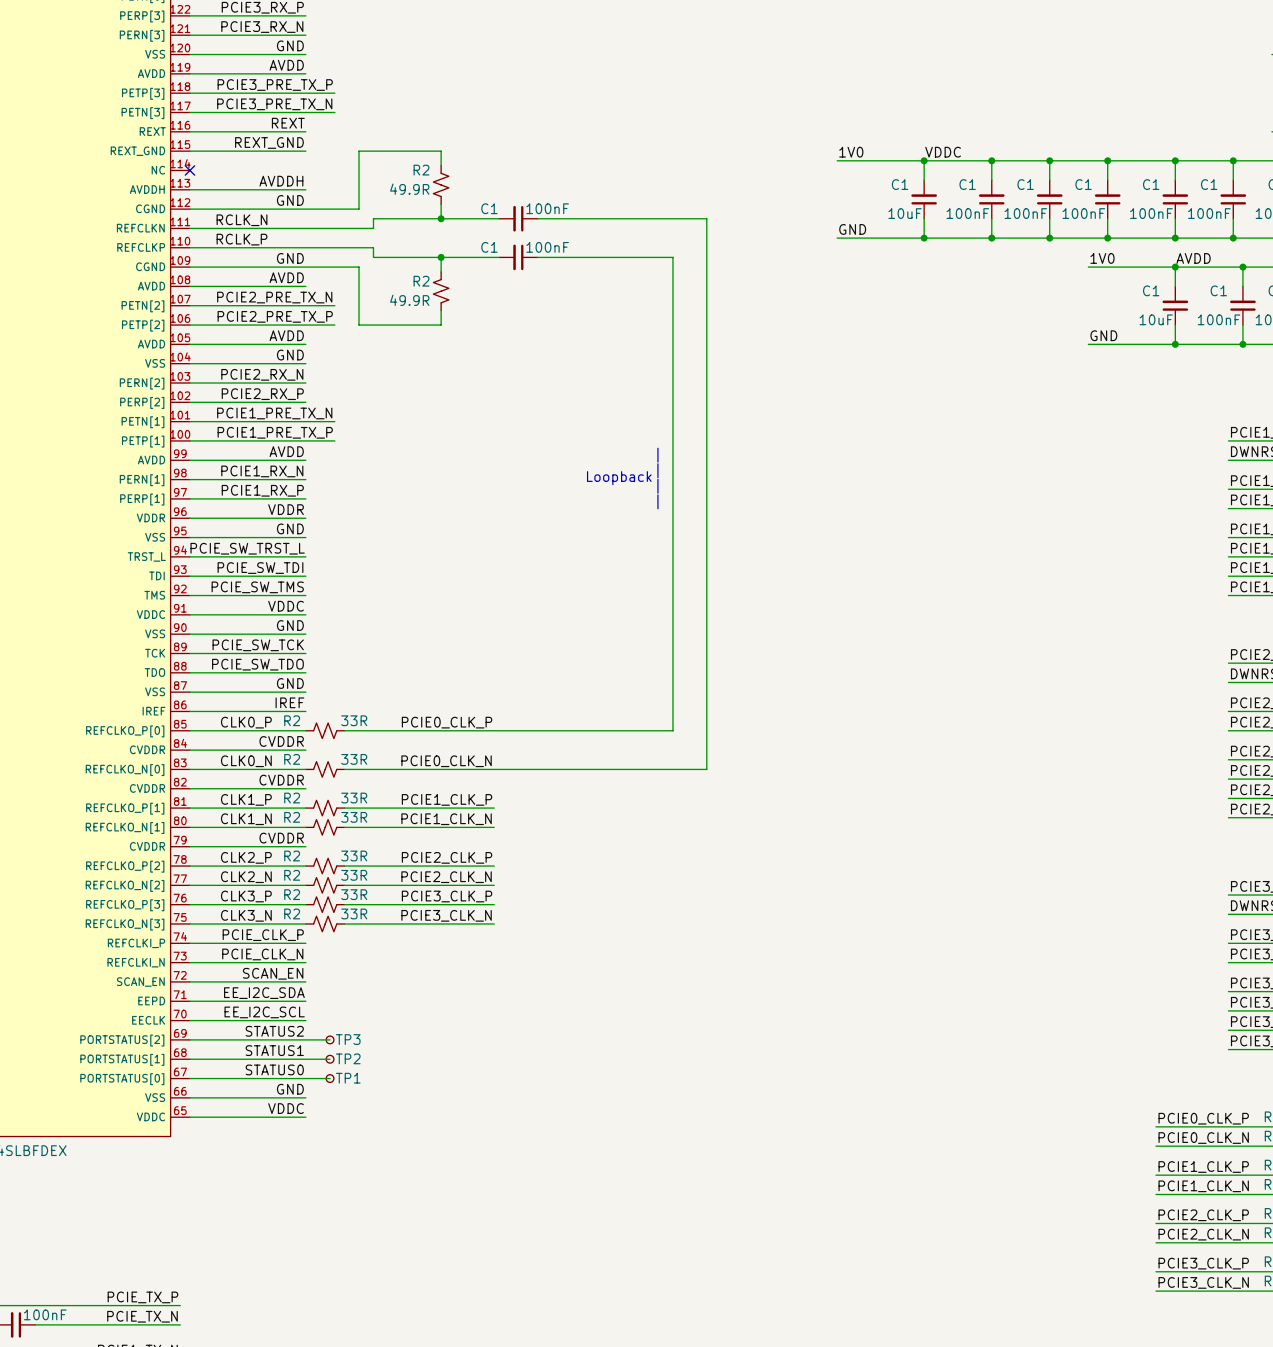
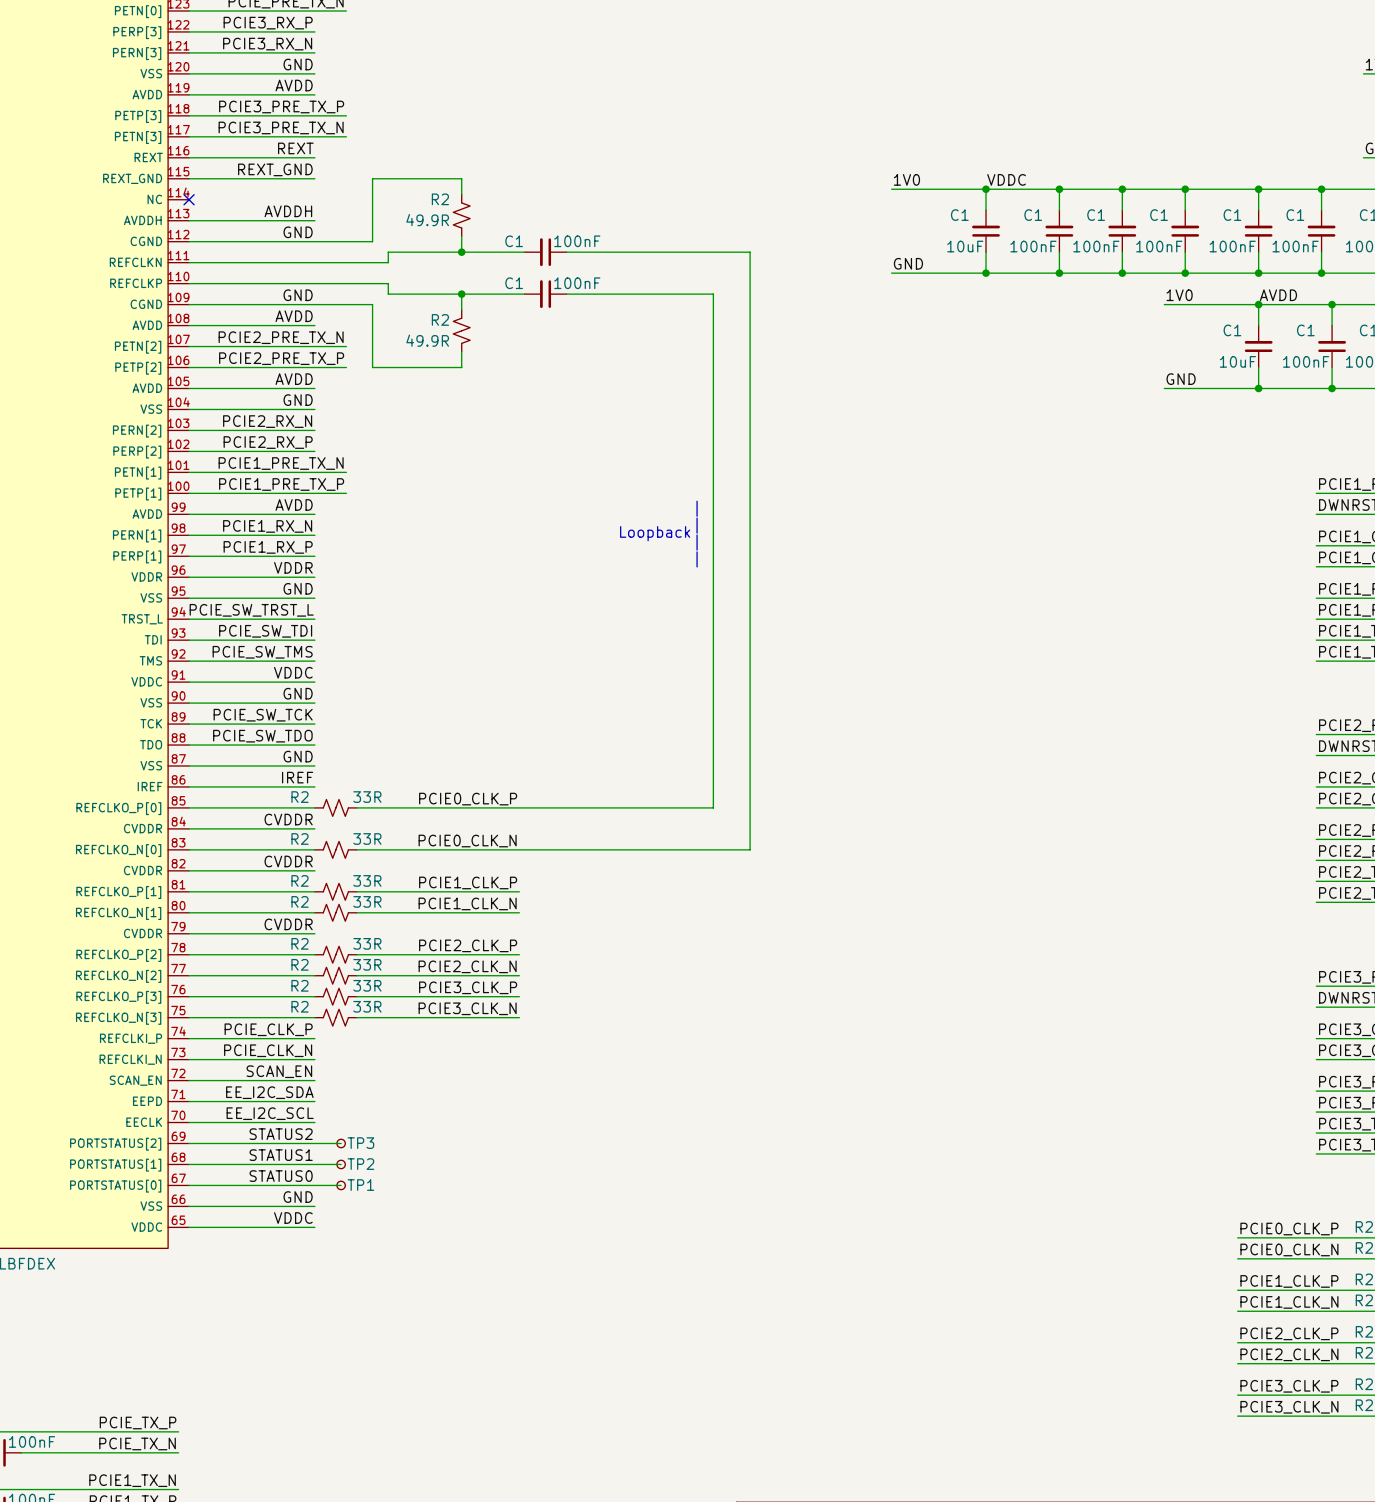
label: RCLK_N (242, 220) -> none
label: RCLK_P (242, 239) -> none
label: CLK0_P (246, 722) -> none
label: CLK0_N (246, 761) -> none
label: CLK1_P (246, 799) -> none
label: CLK1_N (246, 819) -> none
label: CLK2_P (246, 857) -> none
label: CLK2_N (246, 877) -> none
label: CLK3_P (246, 896) -> none
label: CLK3_N (246, 915) -> none

